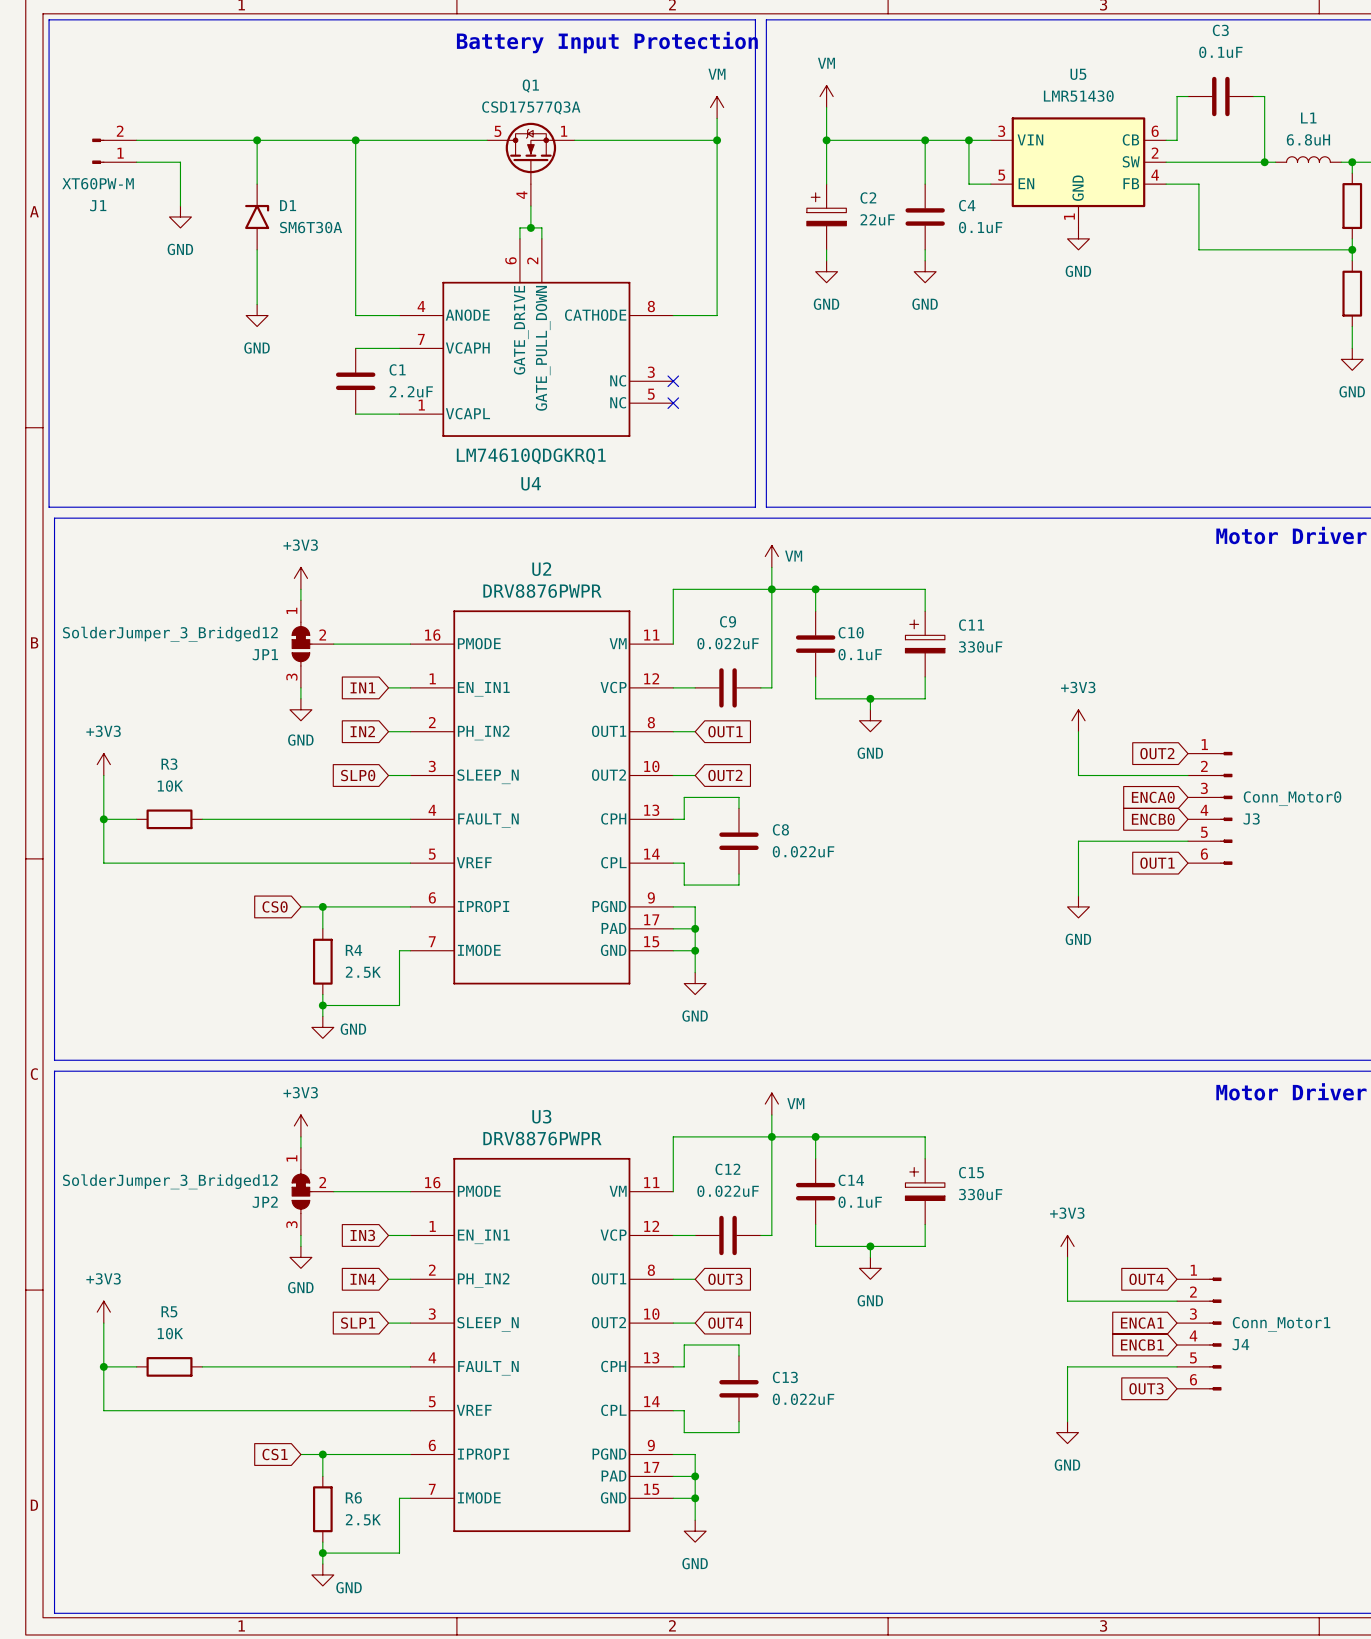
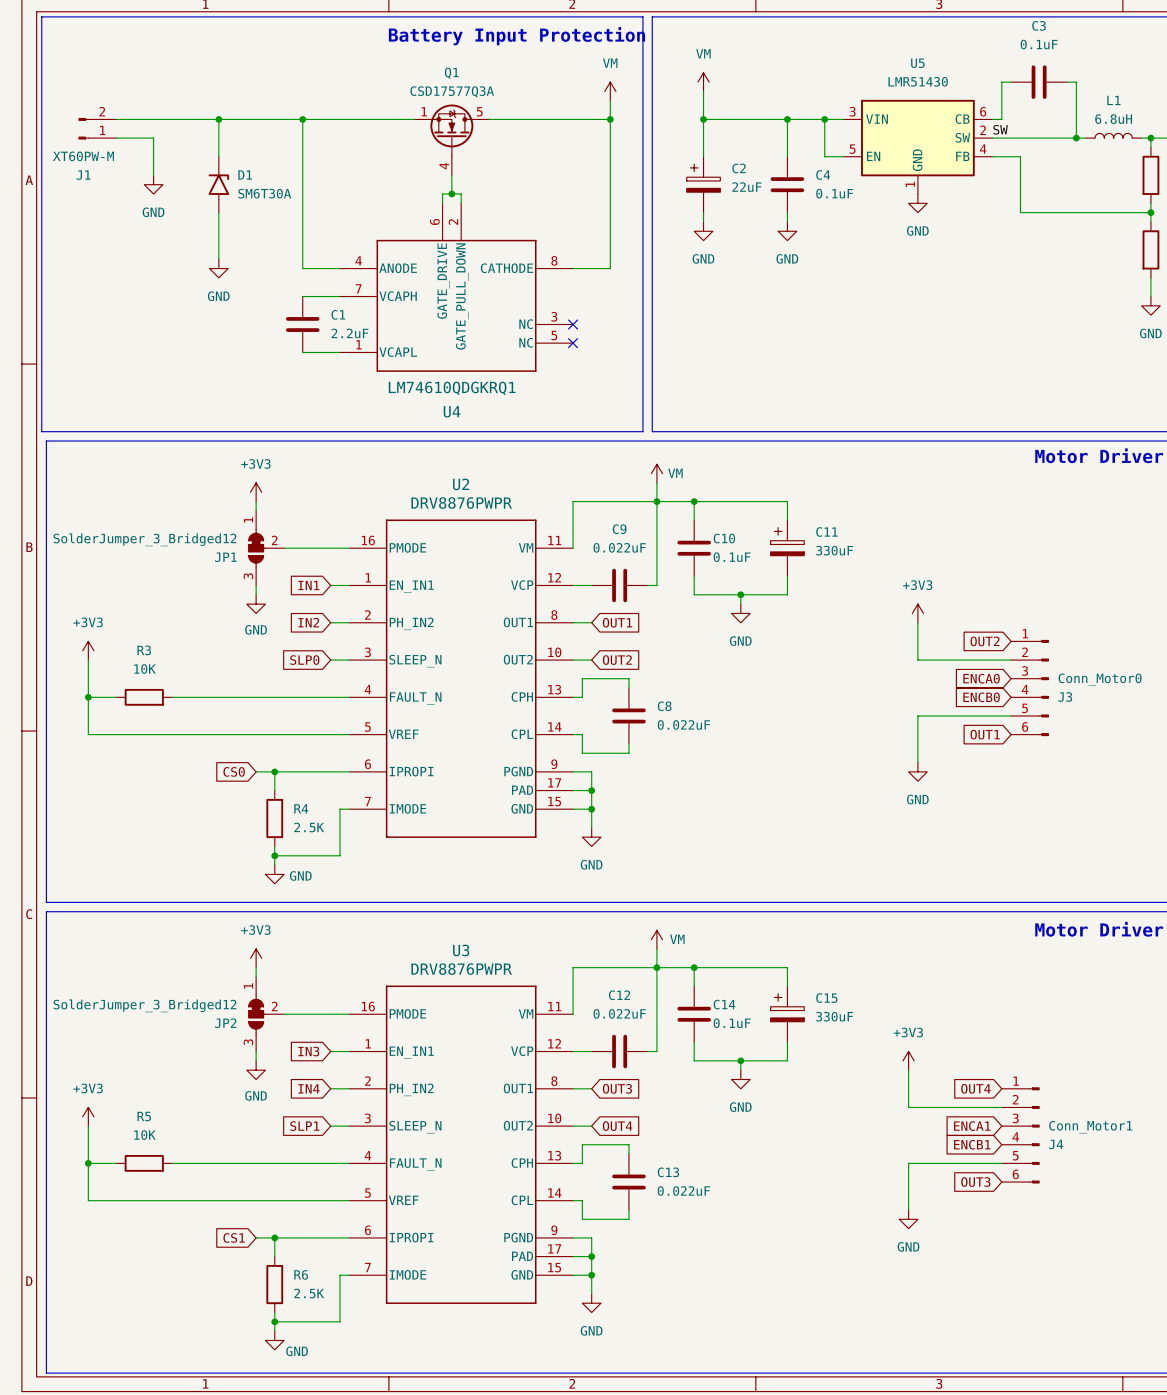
label: none -> SW (1000, 129)
Q1 flip: as is (530, 153) -> left-right (451, 130)

